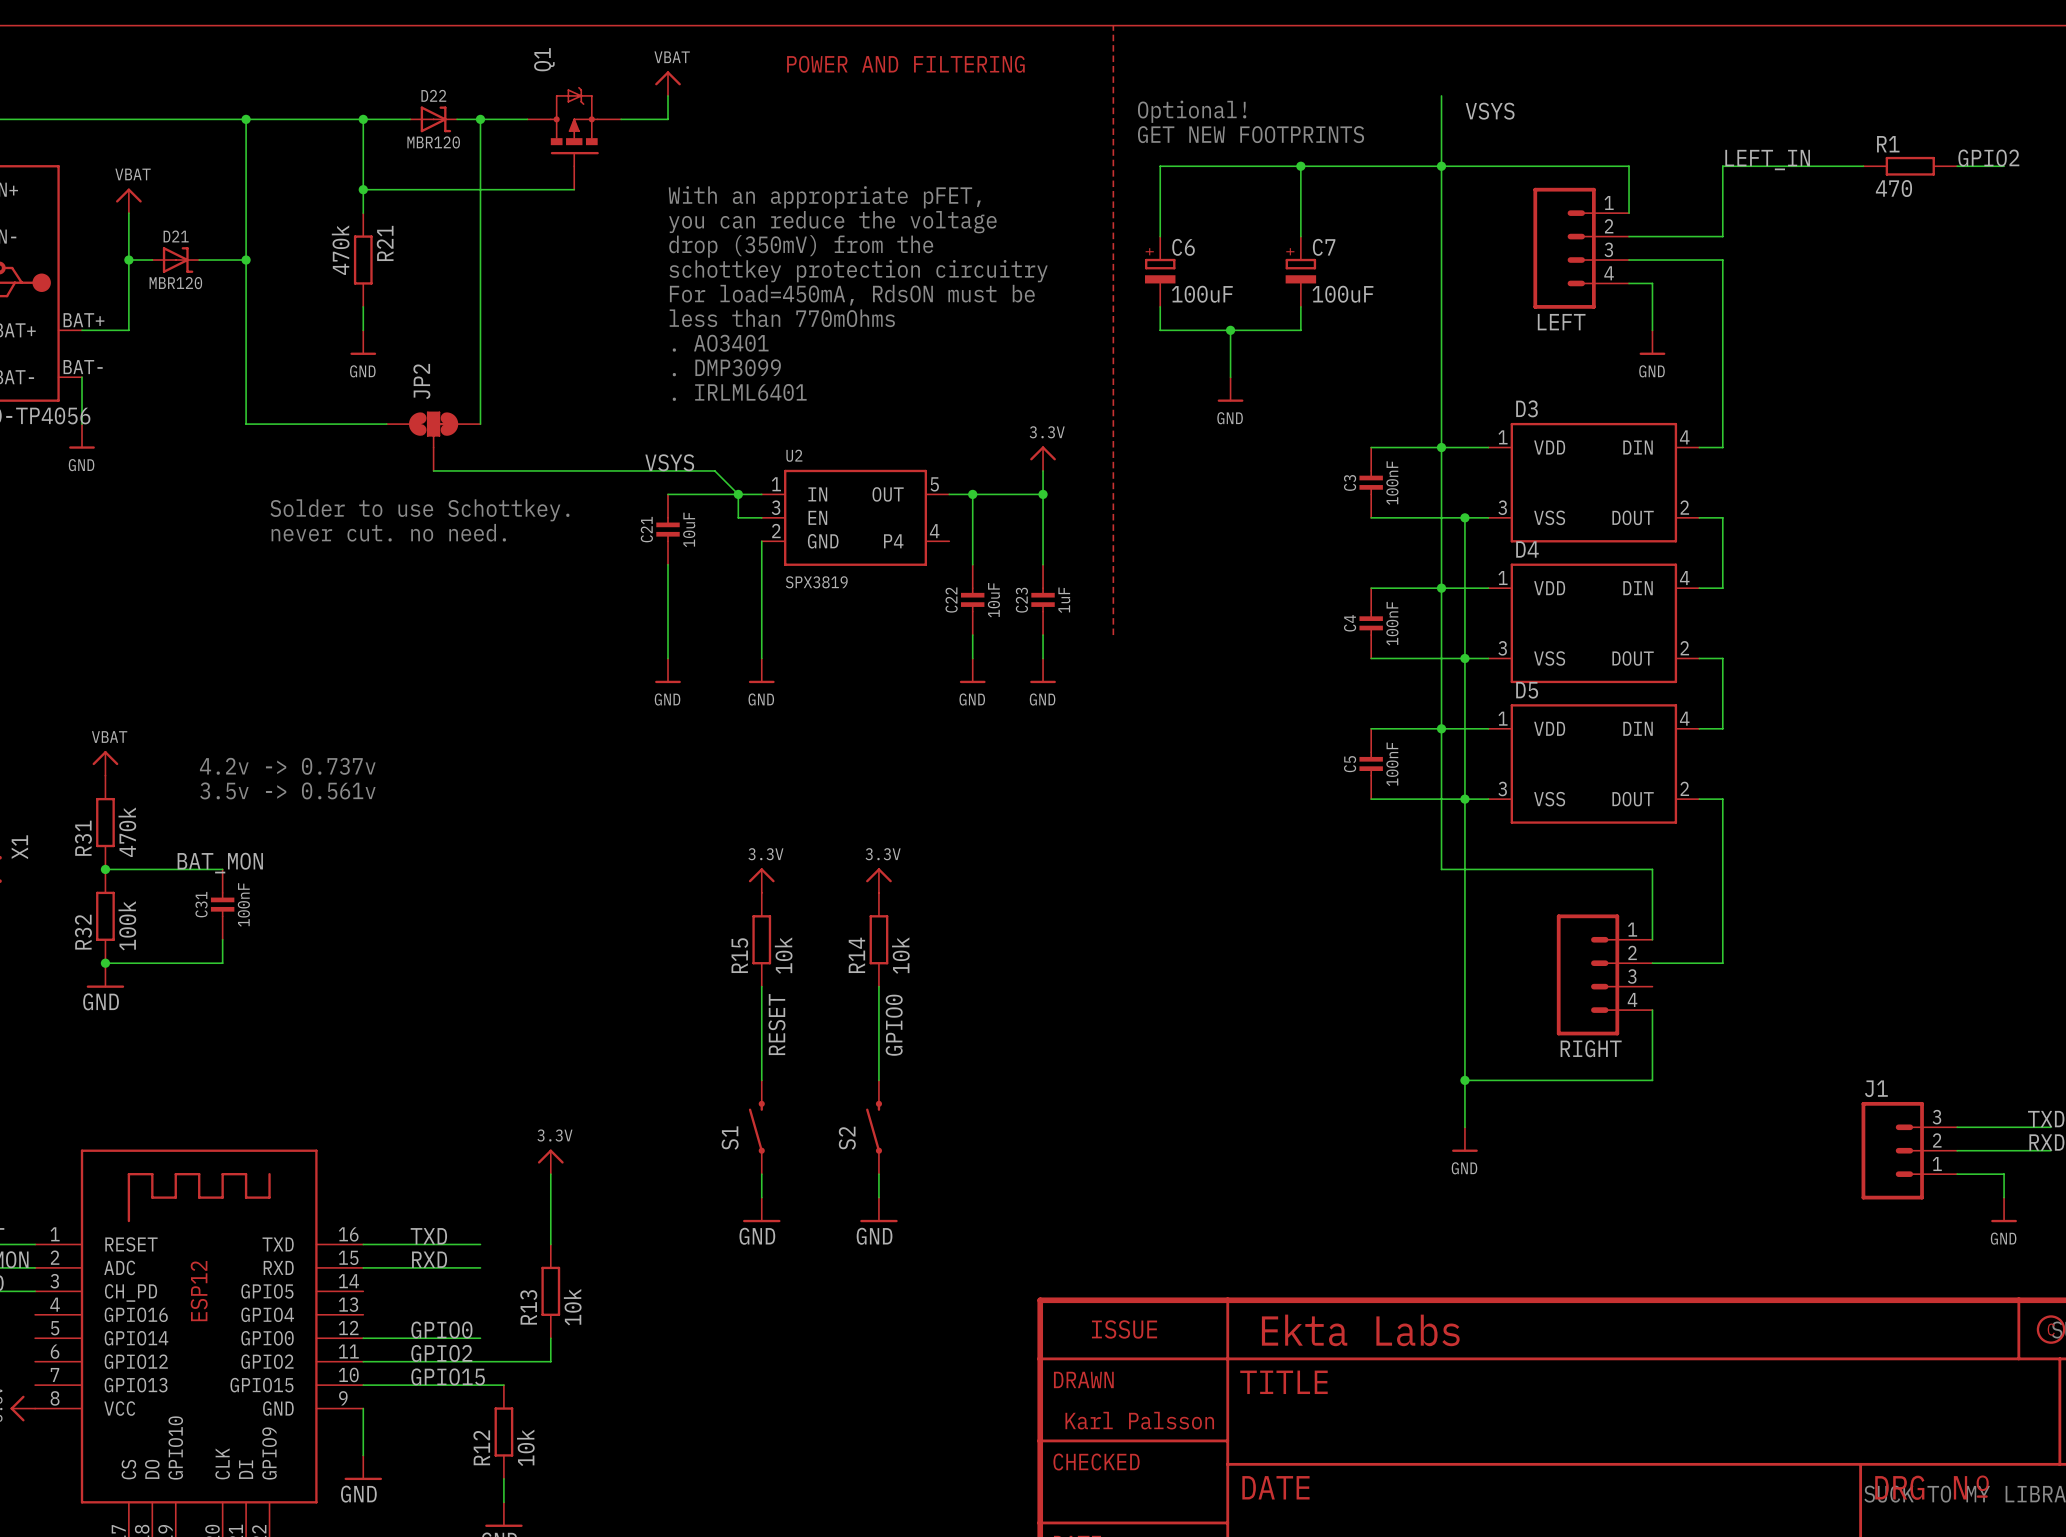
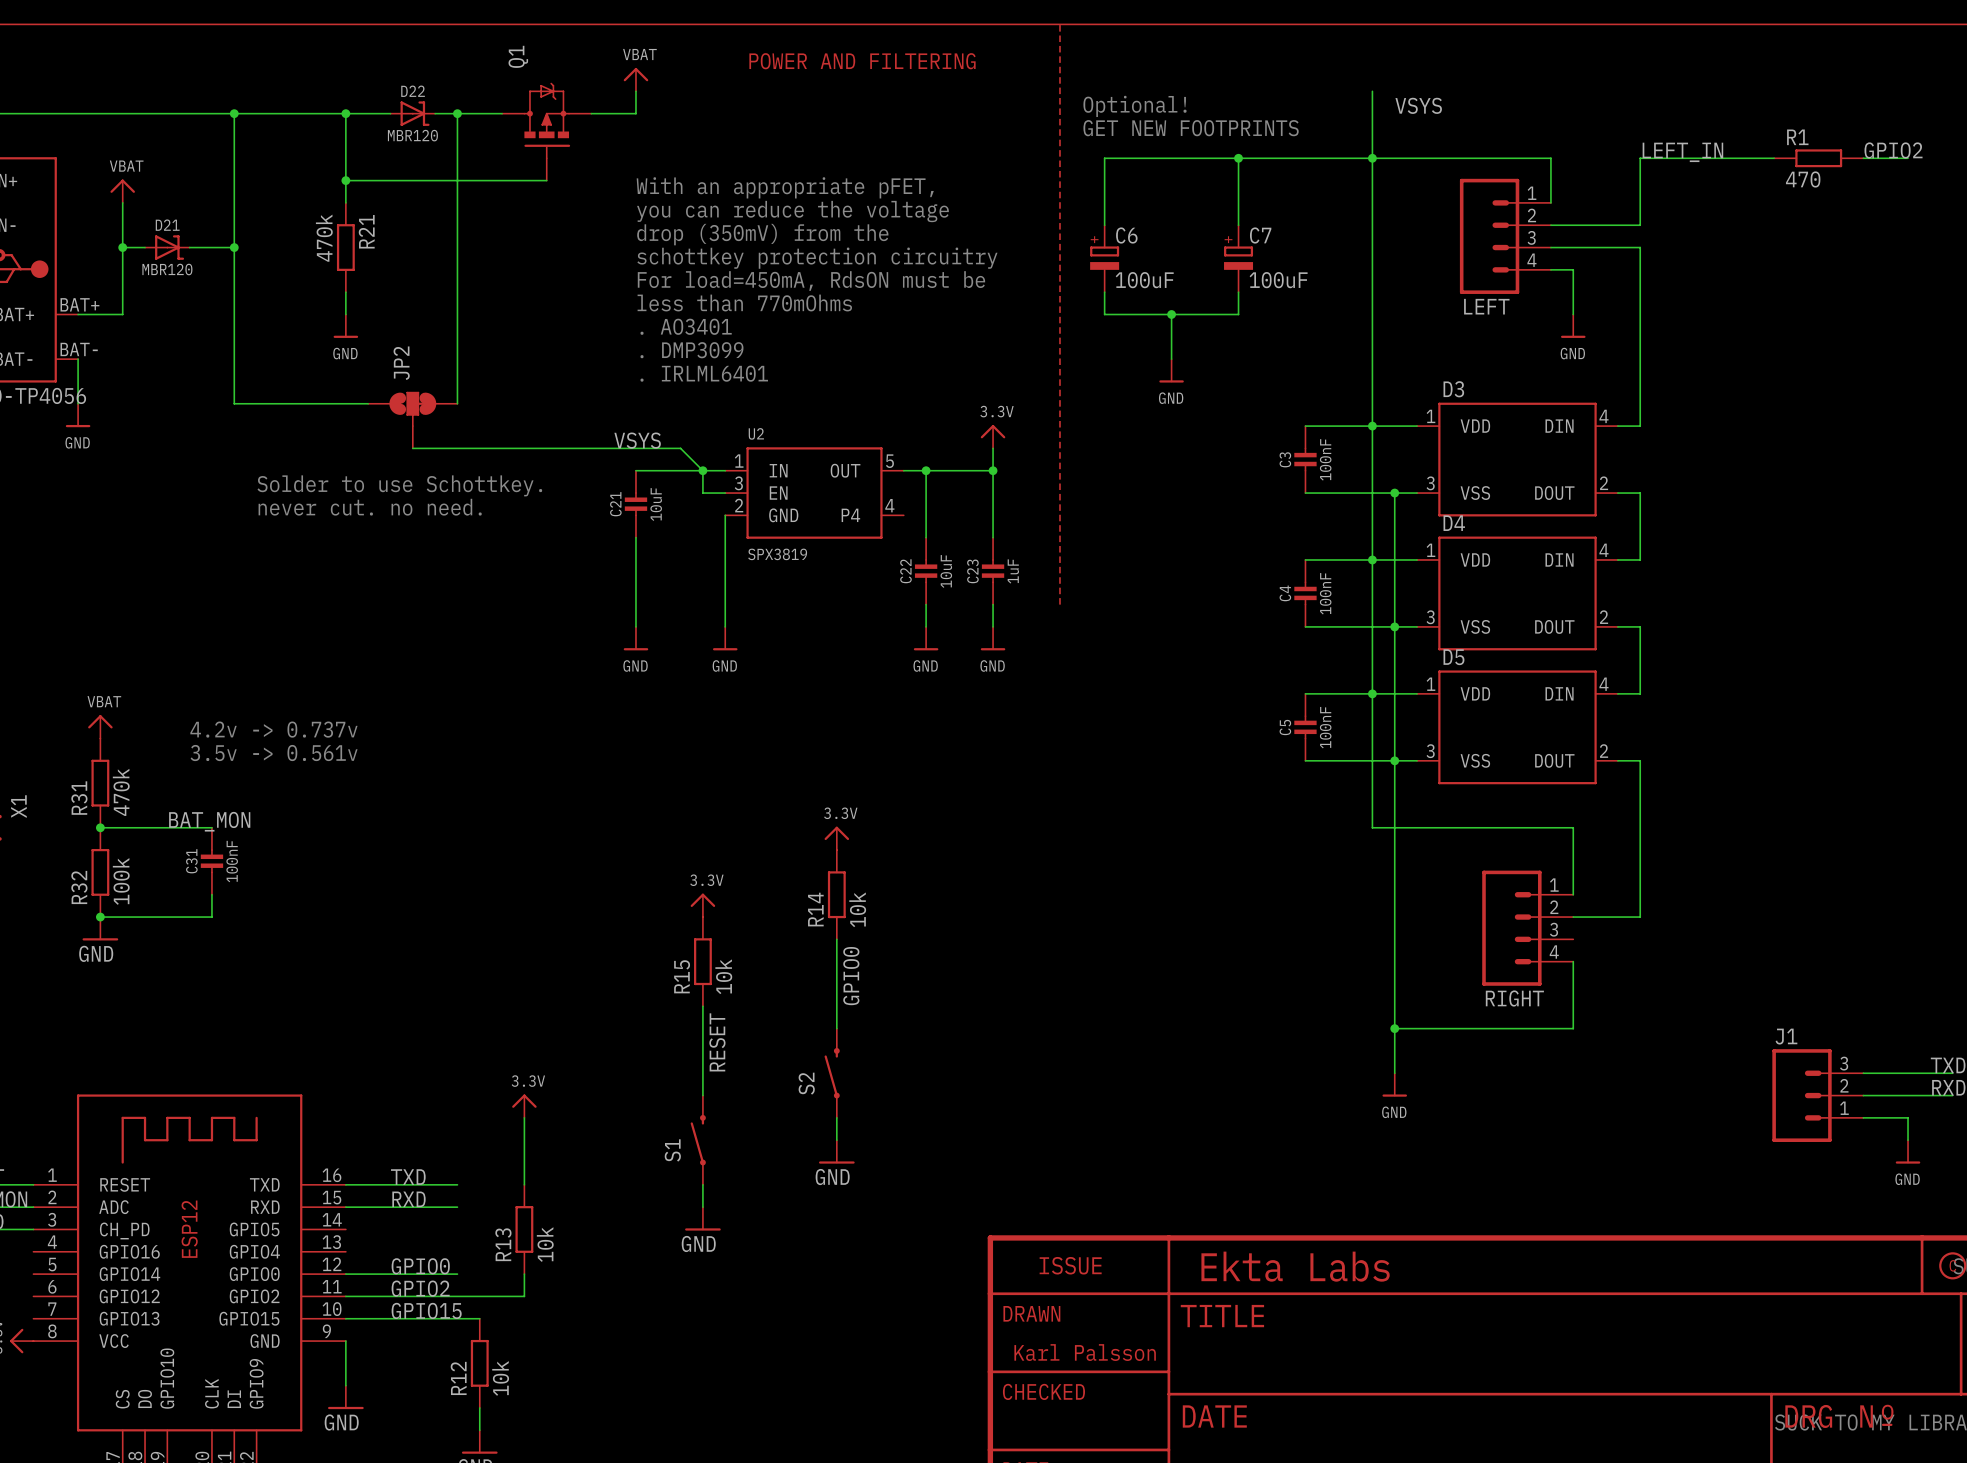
power symbol position: 3.3V (761, 880) -> 3.3V (702, 905)
R15 position: (761, 939) -> (702, 961)
wire: (761, 986) (761, 1080) -> (702, 1006) (702, 1095)
label position: RESET (776, 1024) -> RESET (717, 1042)
S1 position: (756, 1127) -> (698, 1140)
wire: (761, 1174) (761, 1197) -> (702, 1184) (702, 1207)
power symbol position: GND (761, 1209) -> GND (702, 1218)

